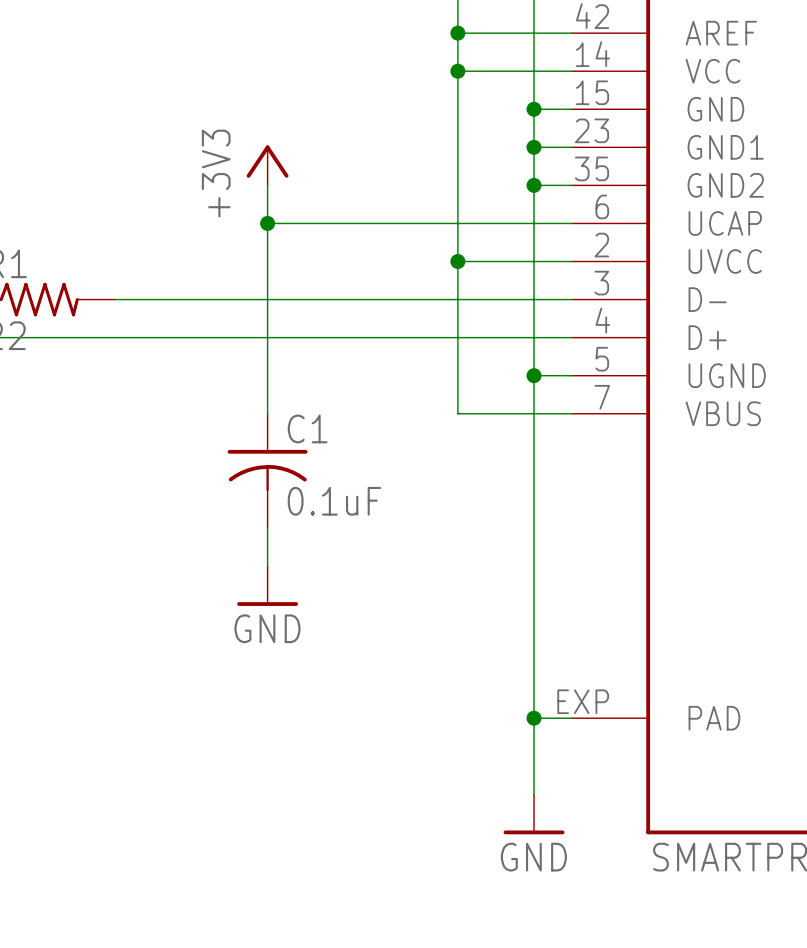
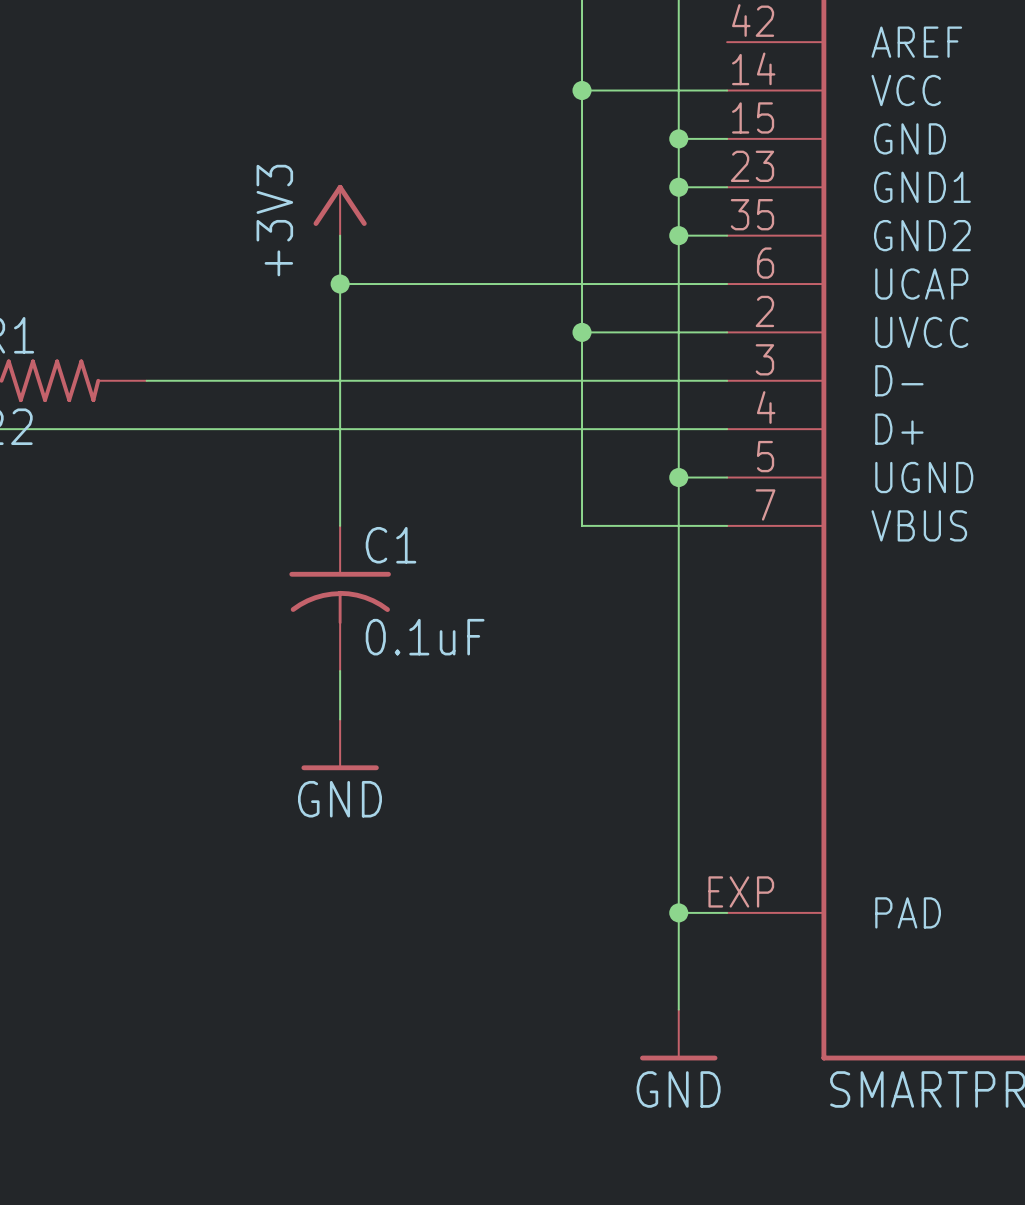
wire: (457, 33) (572, 33) -> none
junction: (457, 33) -> none

